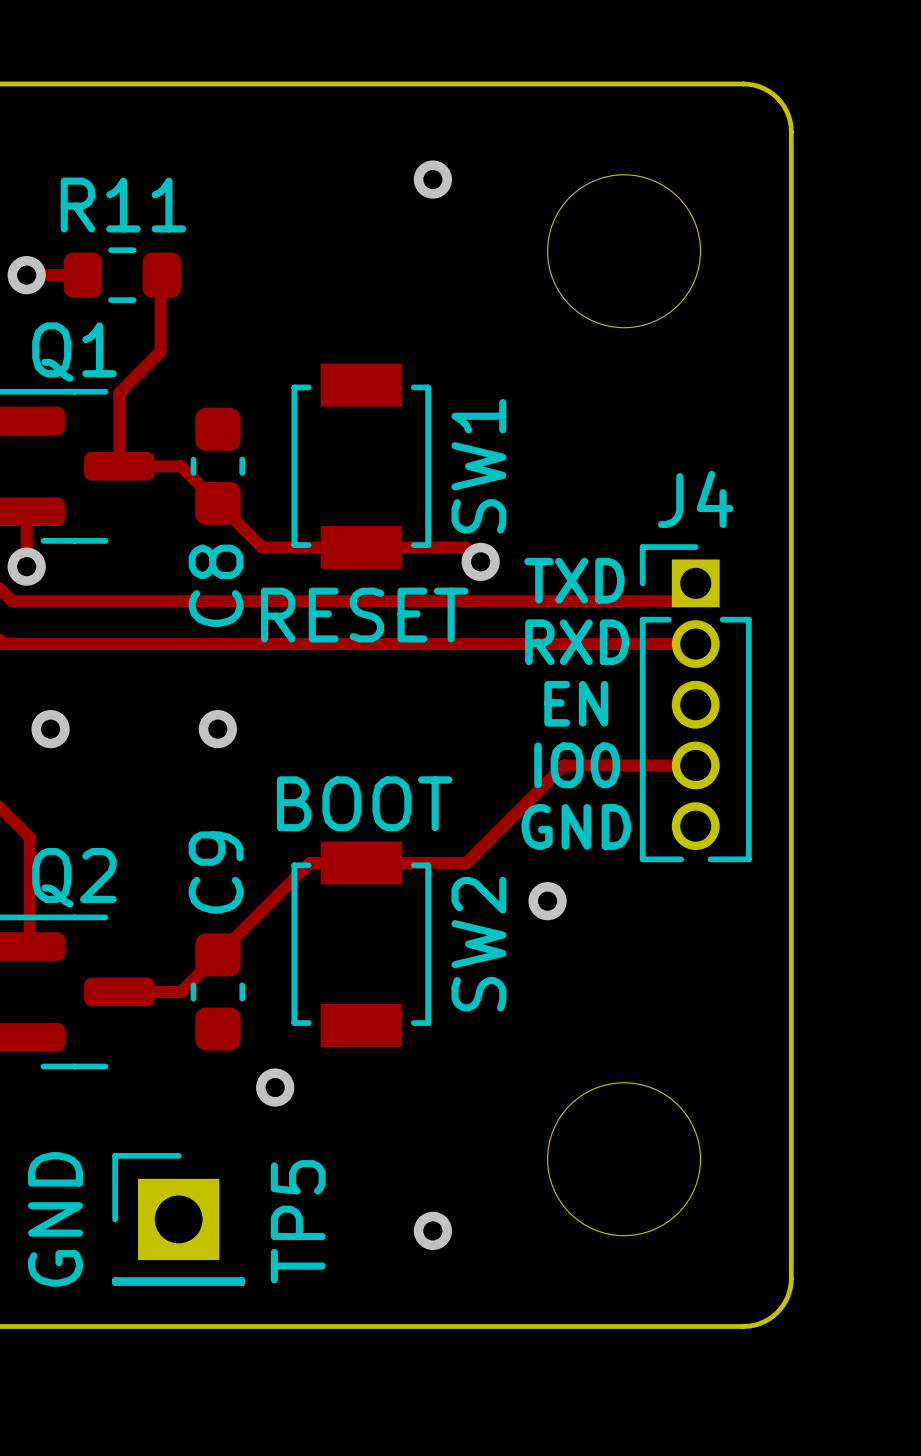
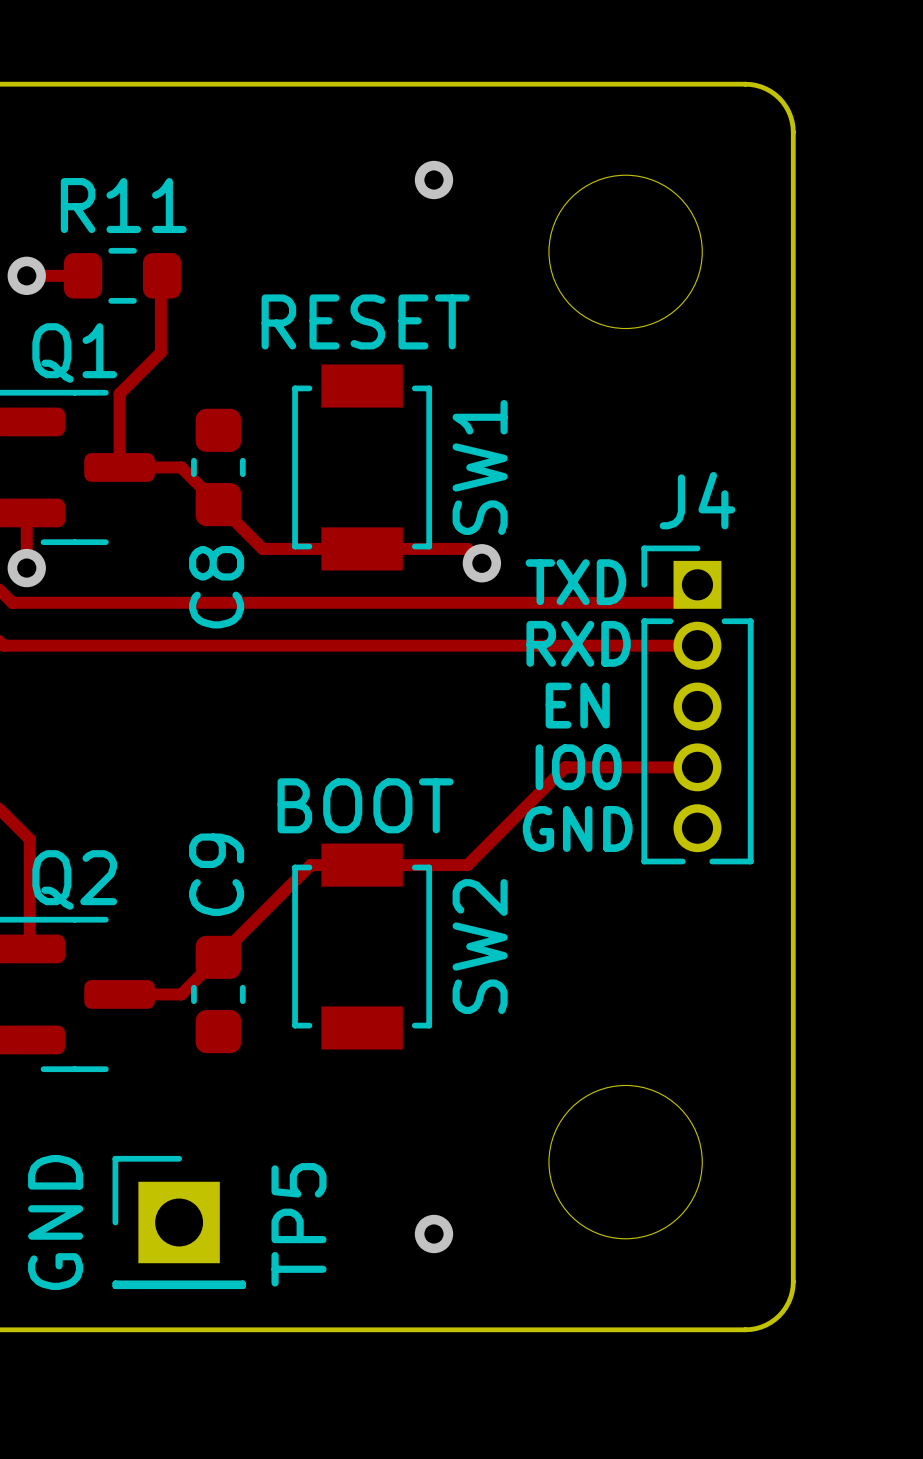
text position: RESET (364, 615) -> RESET (365, 321)
via: (50, 729) -> none
via: (217, 729) -> none
via: (547, 901) -> none
via: (275, 1087) -> none

